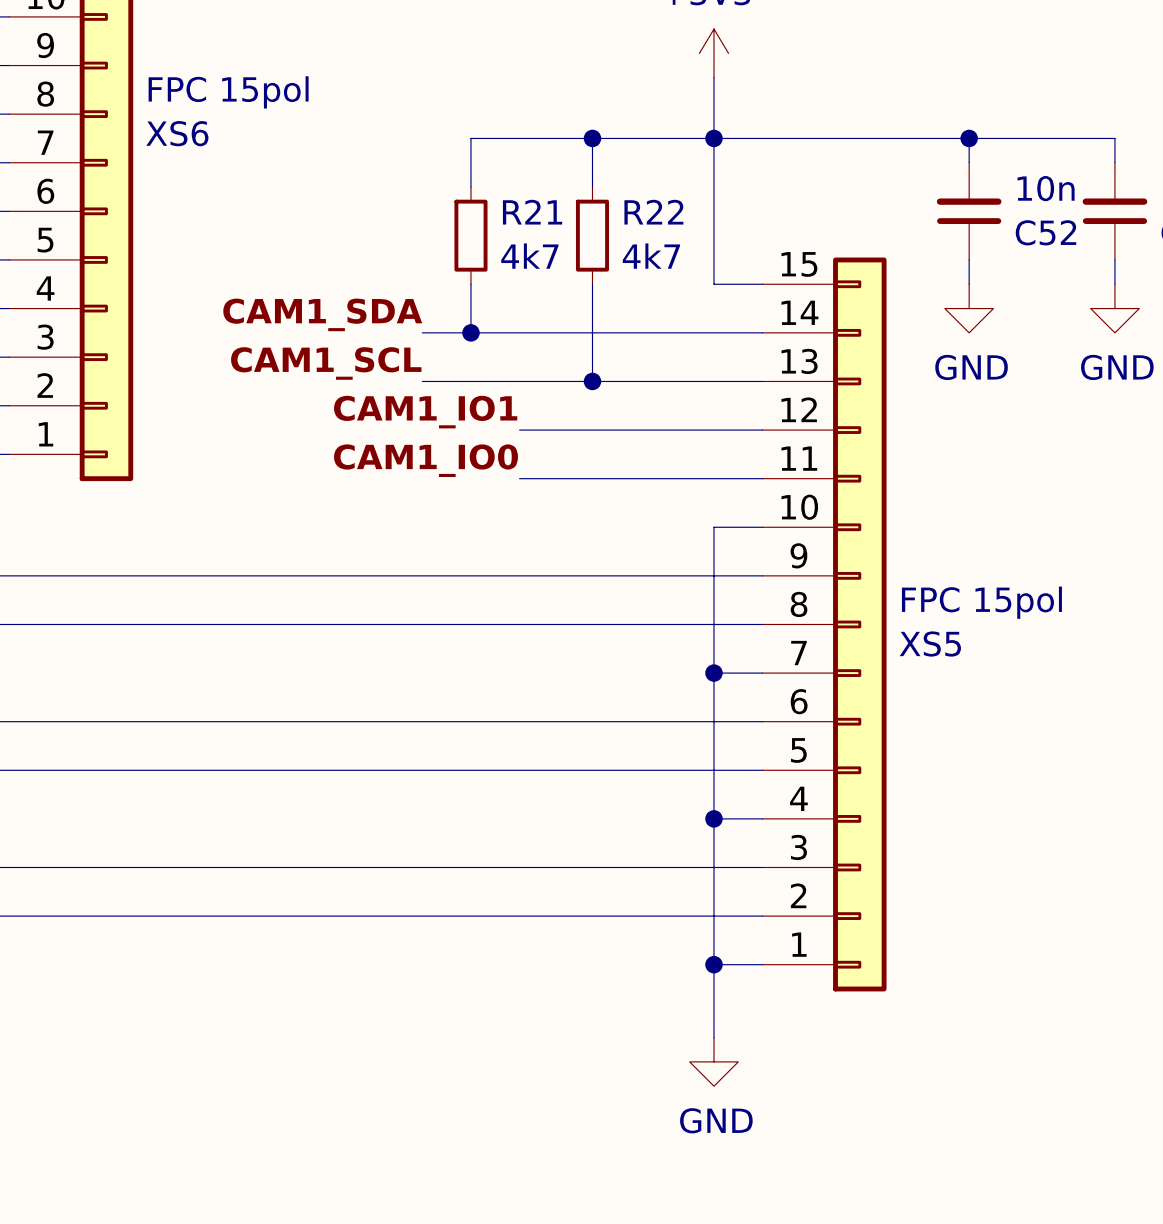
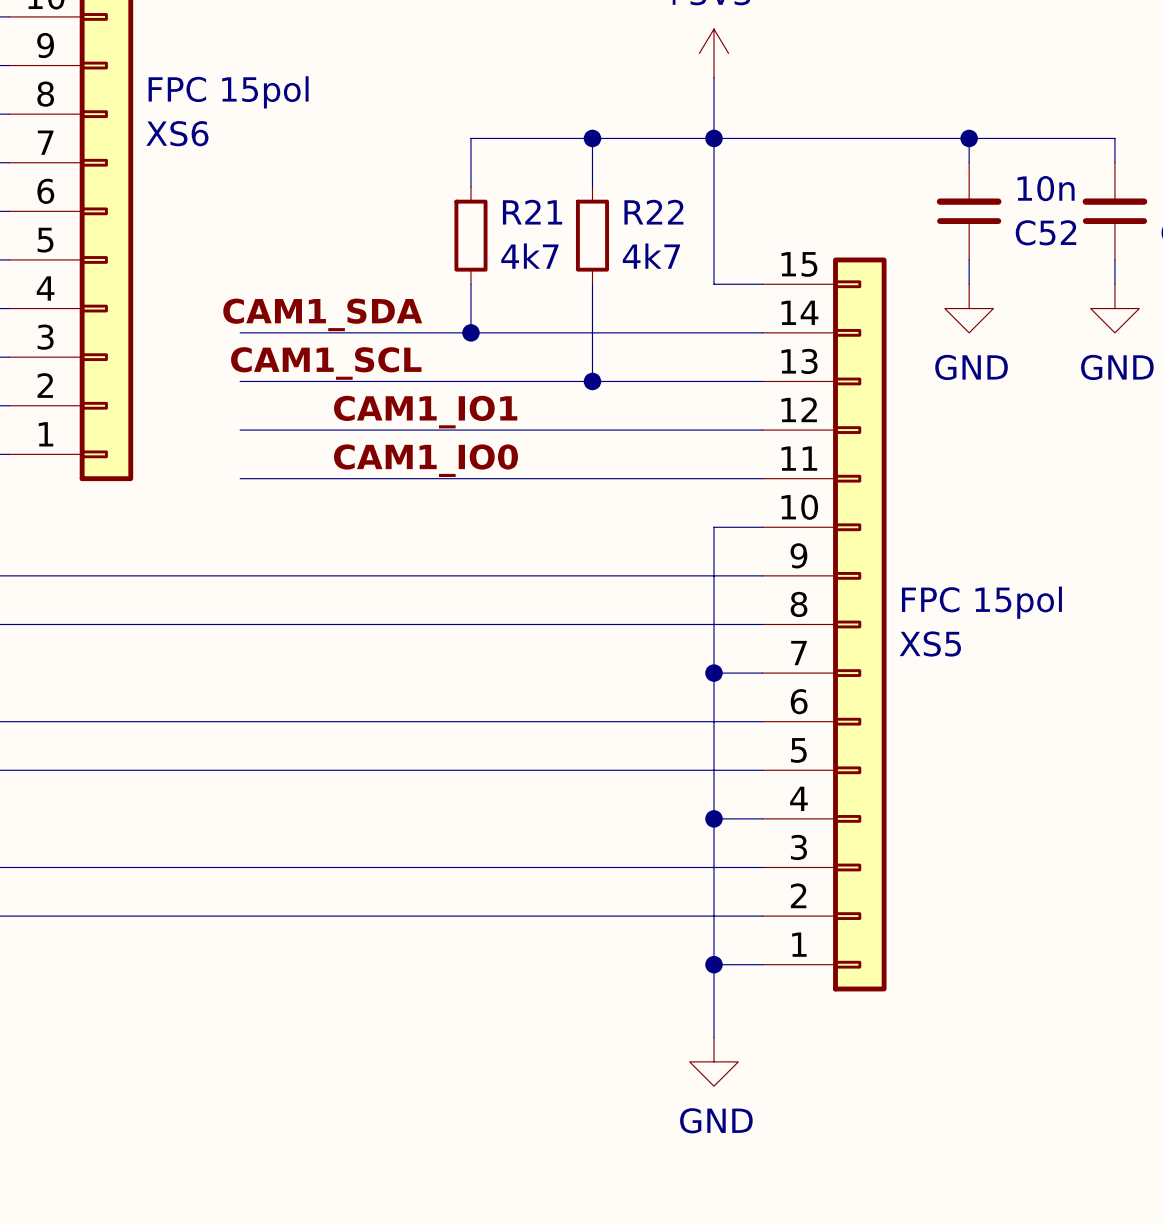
wire: none -> (240, 332) (422, 332)
wire: none -> (240, 381) (422, 381)
wire: none -> (240, 430) (519, 430)
wire: none -> (240, 478) (519, 478)

